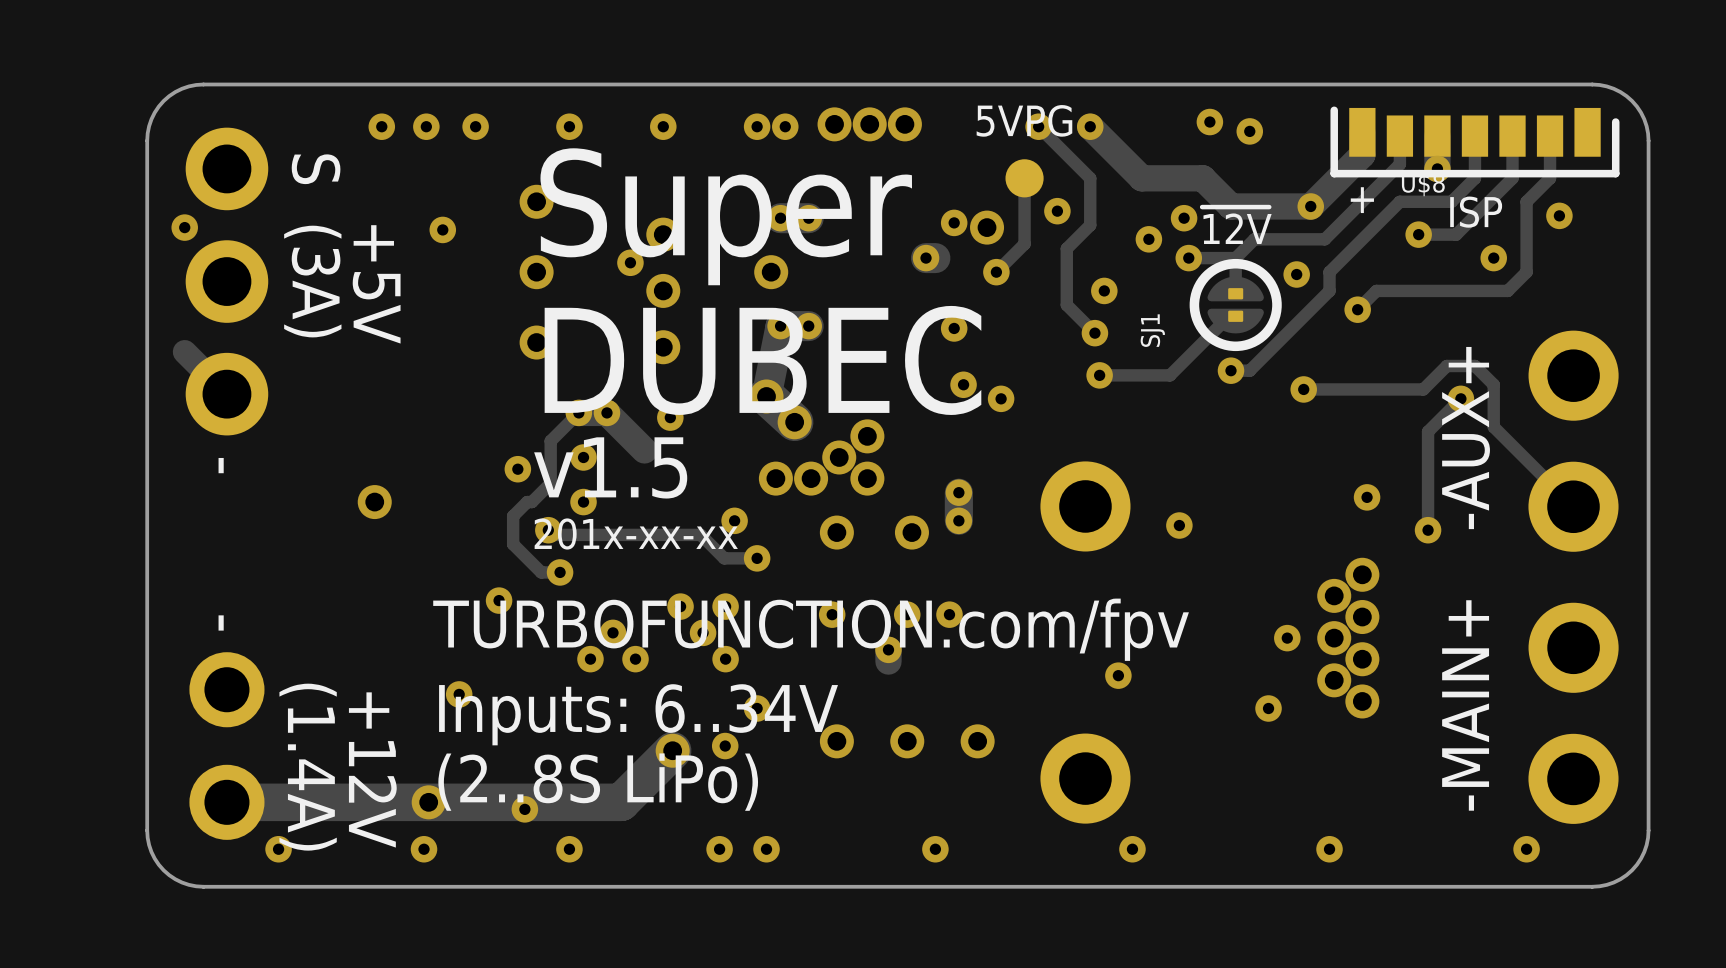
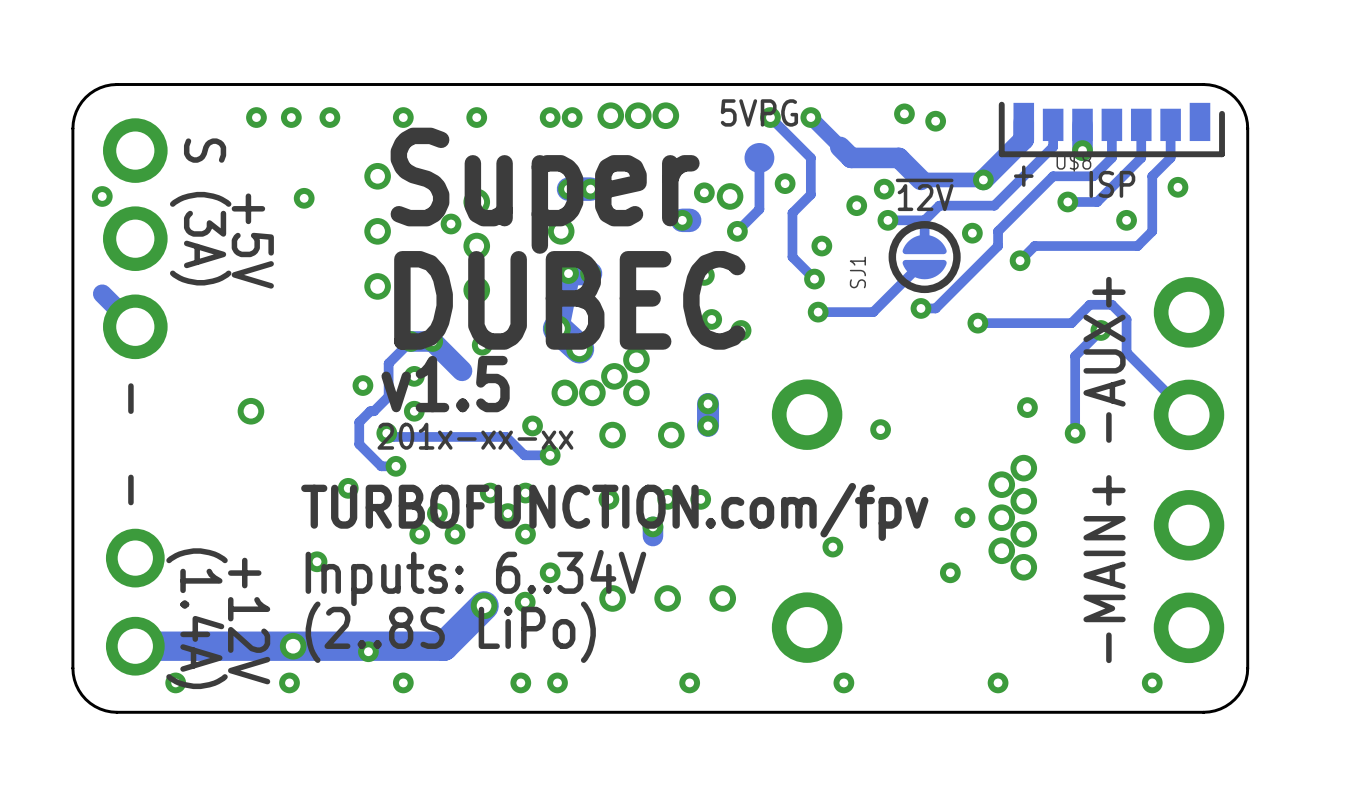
track width: thick (1090, 126) (1127, 164) -> thin (810, 117) (840, 146)
track width: thick (1310, 206) (1231, 206) -> thin (983, 179) (920, 179)

